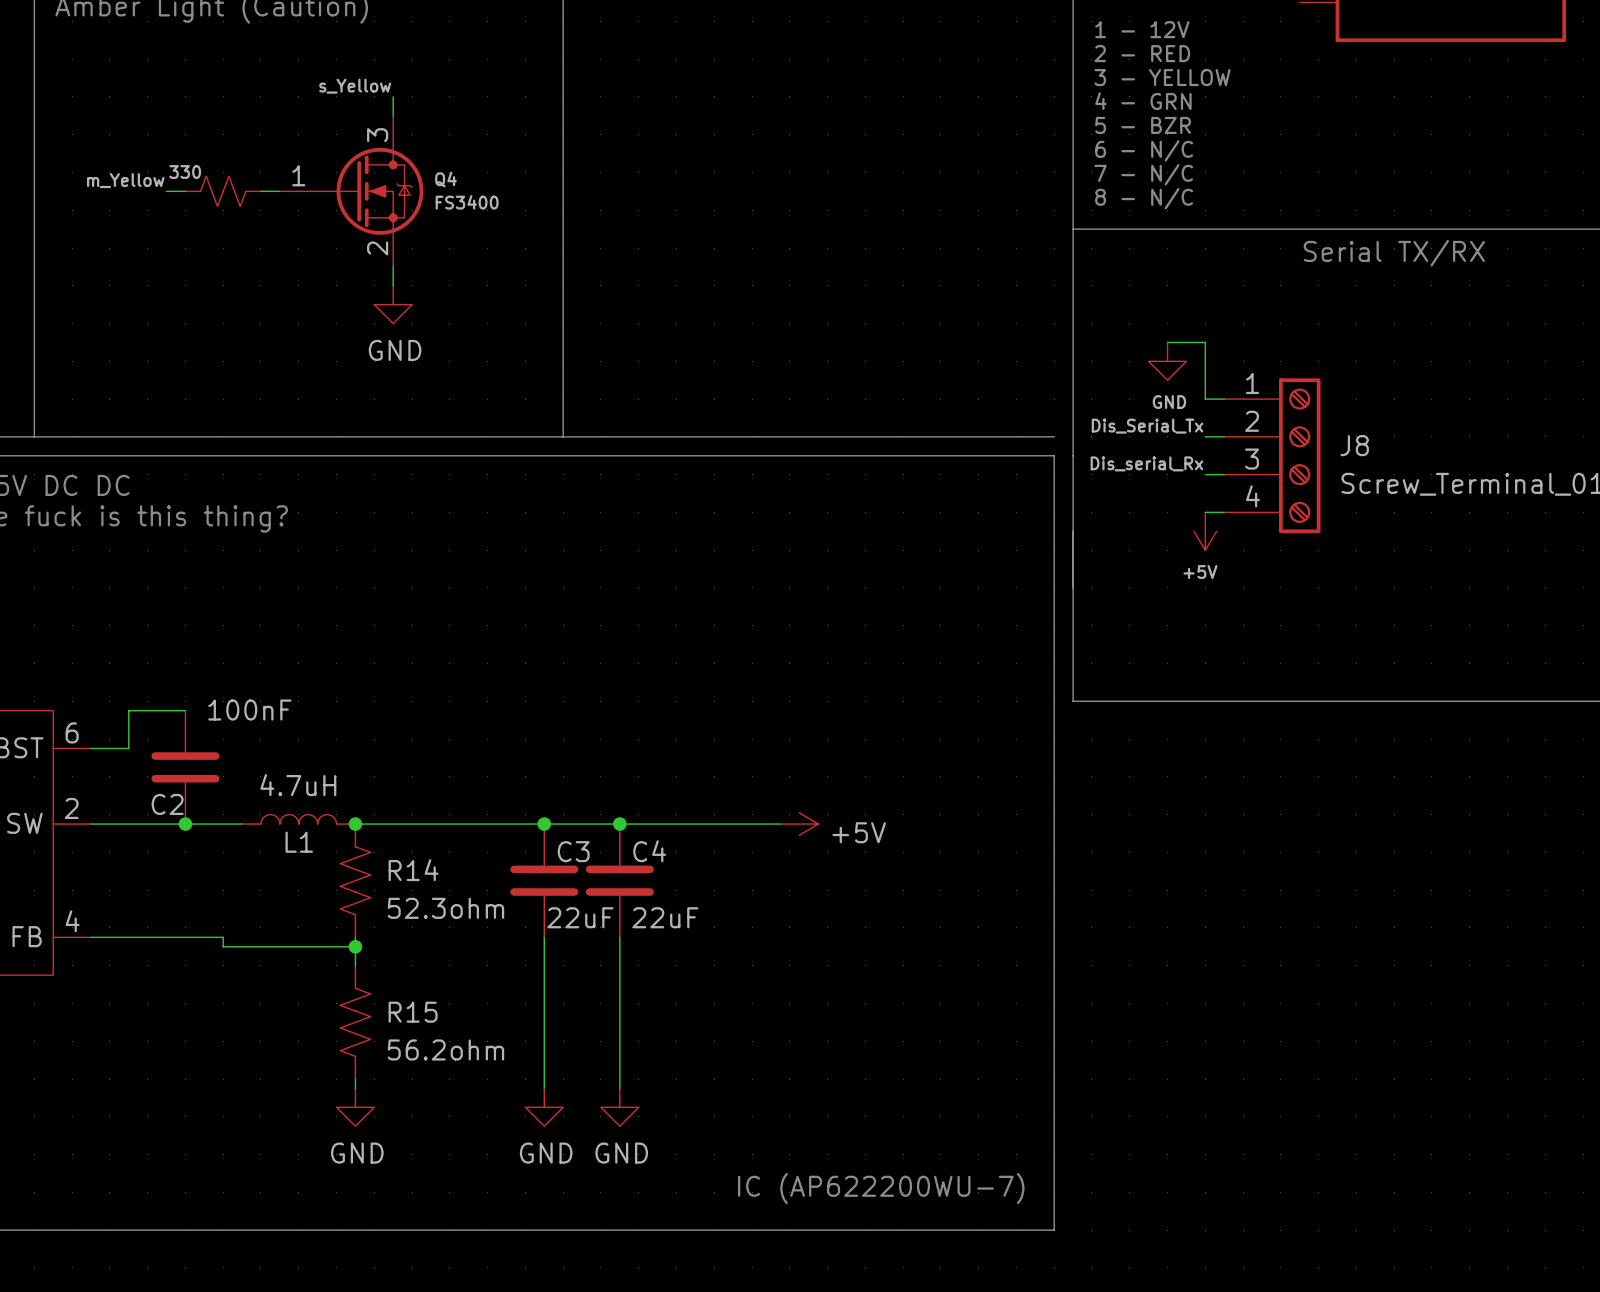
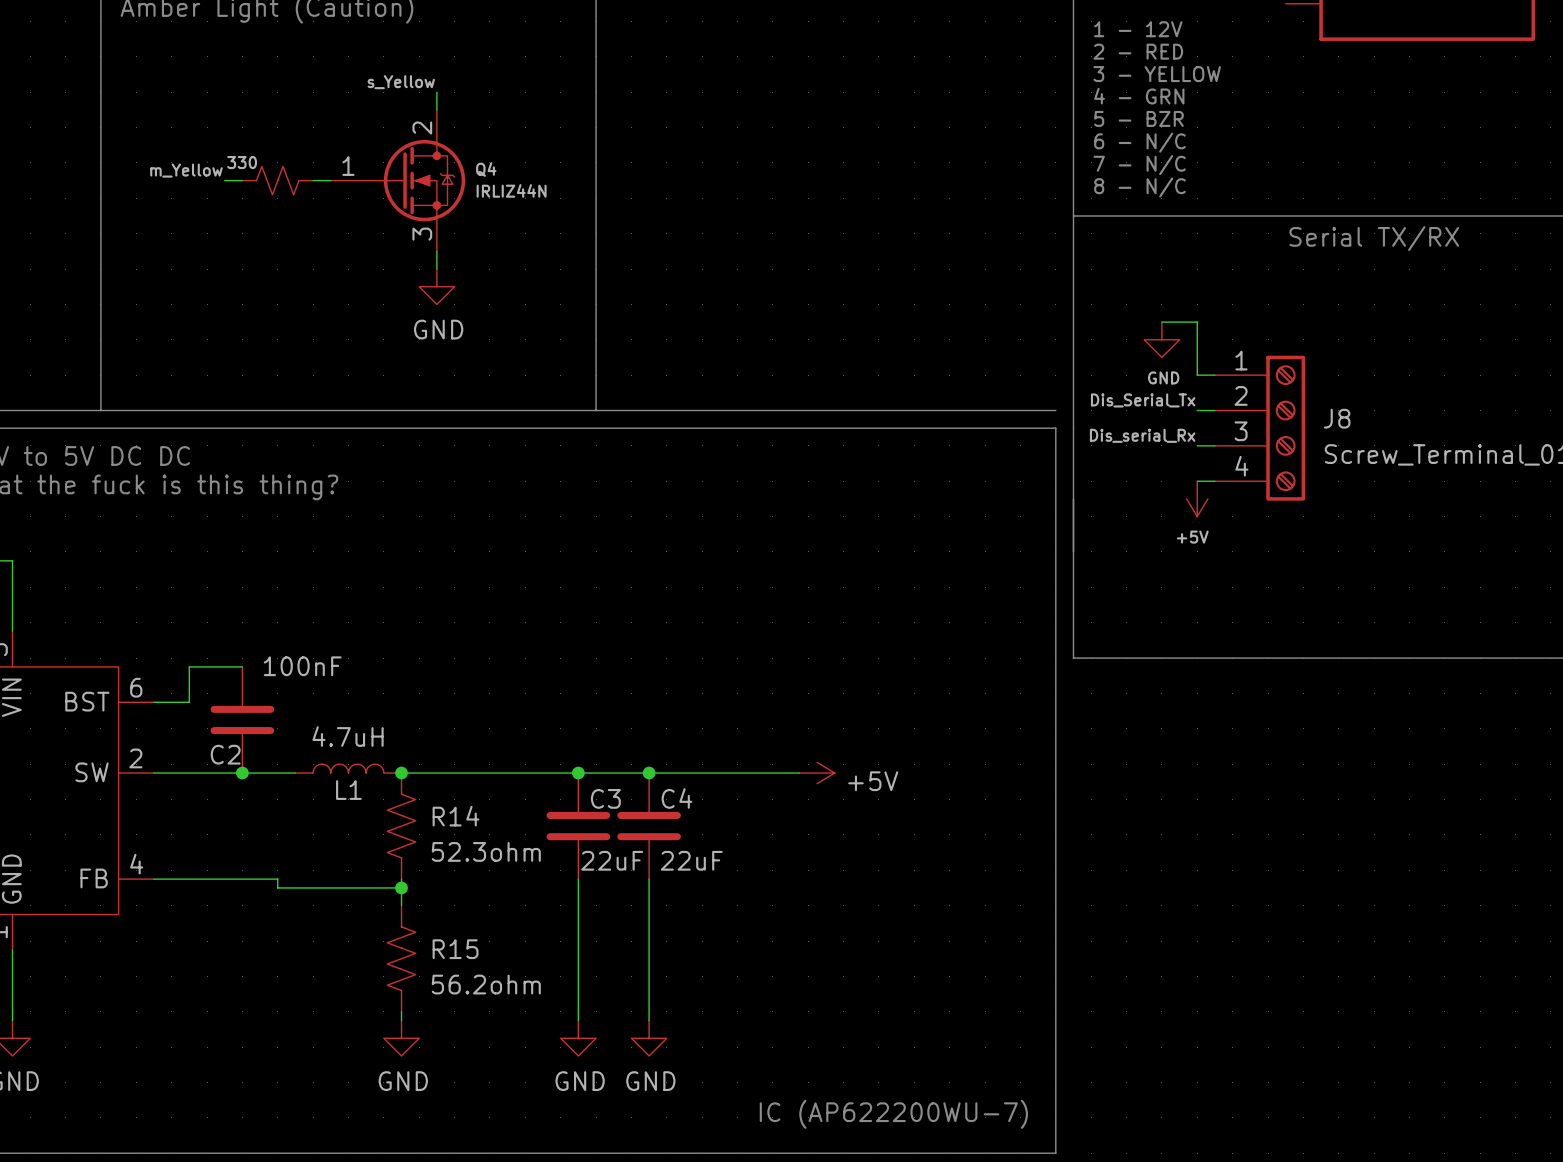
Q4 pin number: 3 (377, 135) -> 2 (422, 128)
Q4 value: FS3400 (467, 202) -> IRLIZ44N (511, 190)
Q4 pin number: 2 (377, 248) -> 3 (422, 234)

